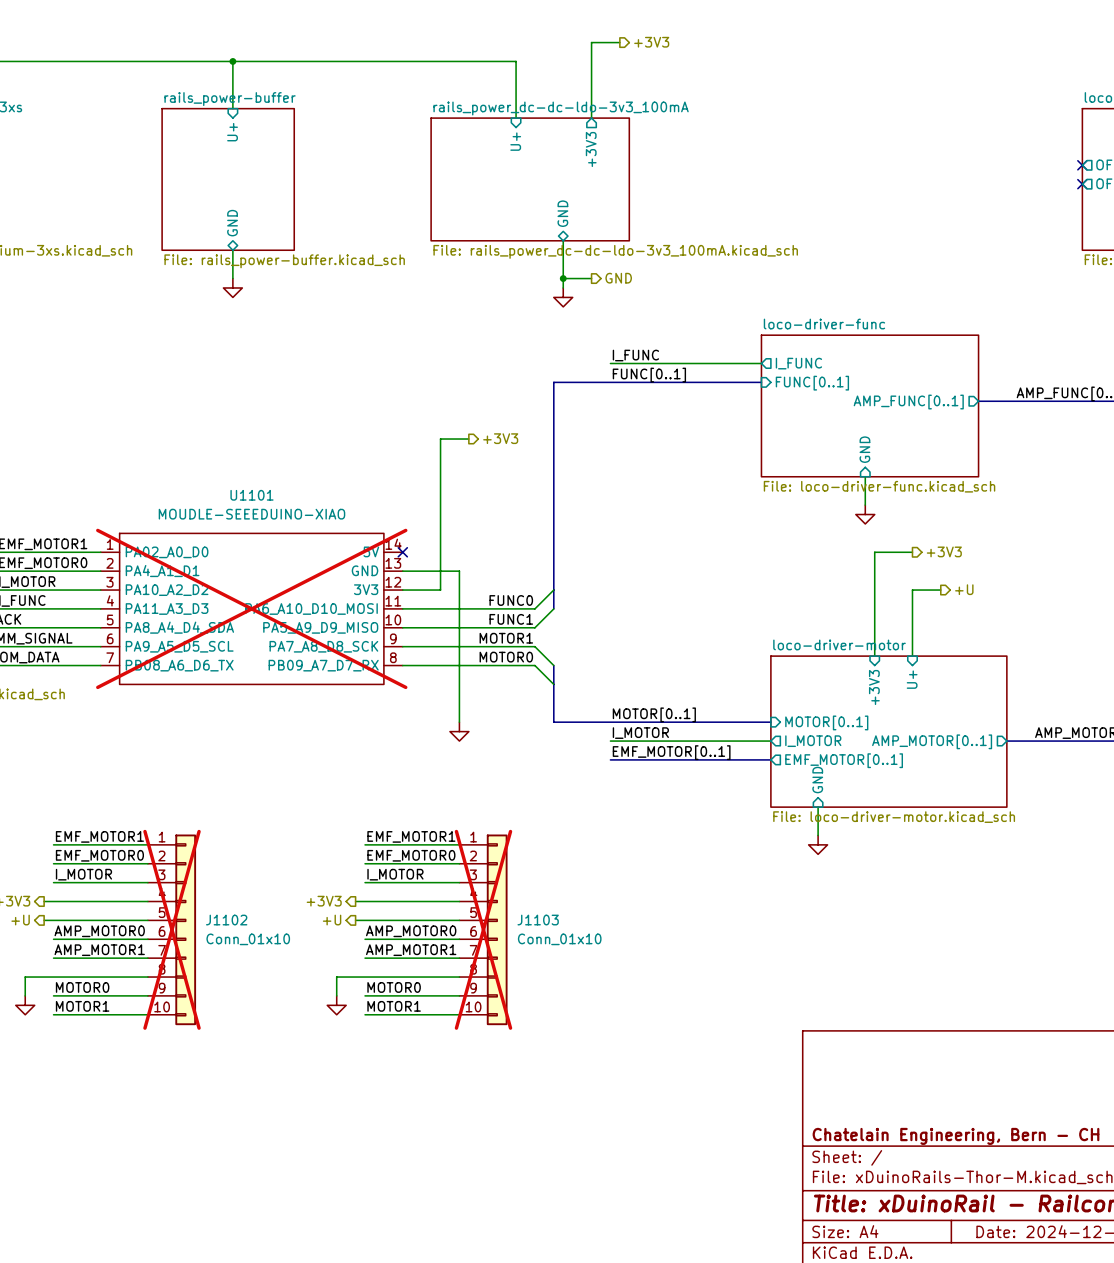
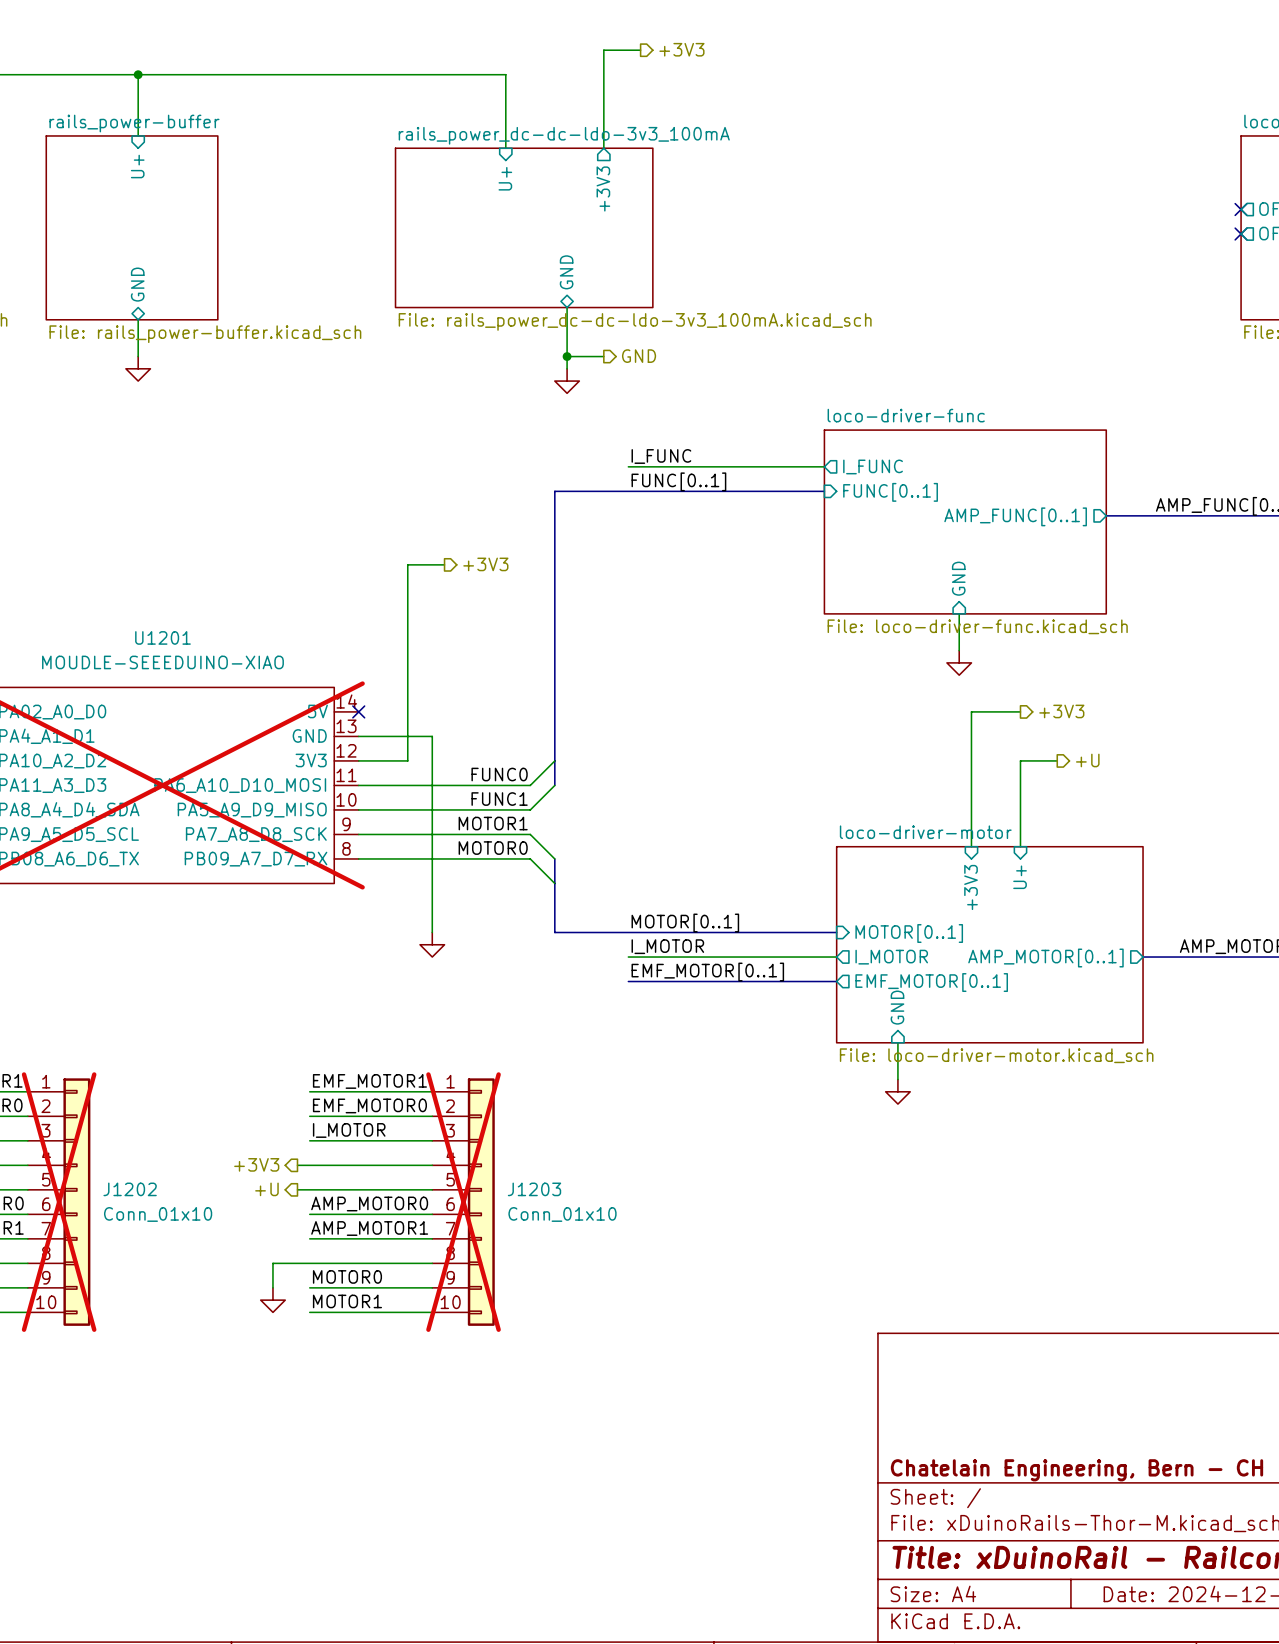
U1101 name: U1101 (251, 495) -> U1201 (162, 637)
J1102 name: J1102 (226, 920) -> J1202 (130, 1189)
J1103 name: J1103 (538, 920) -> J1203 (534, 1189)

